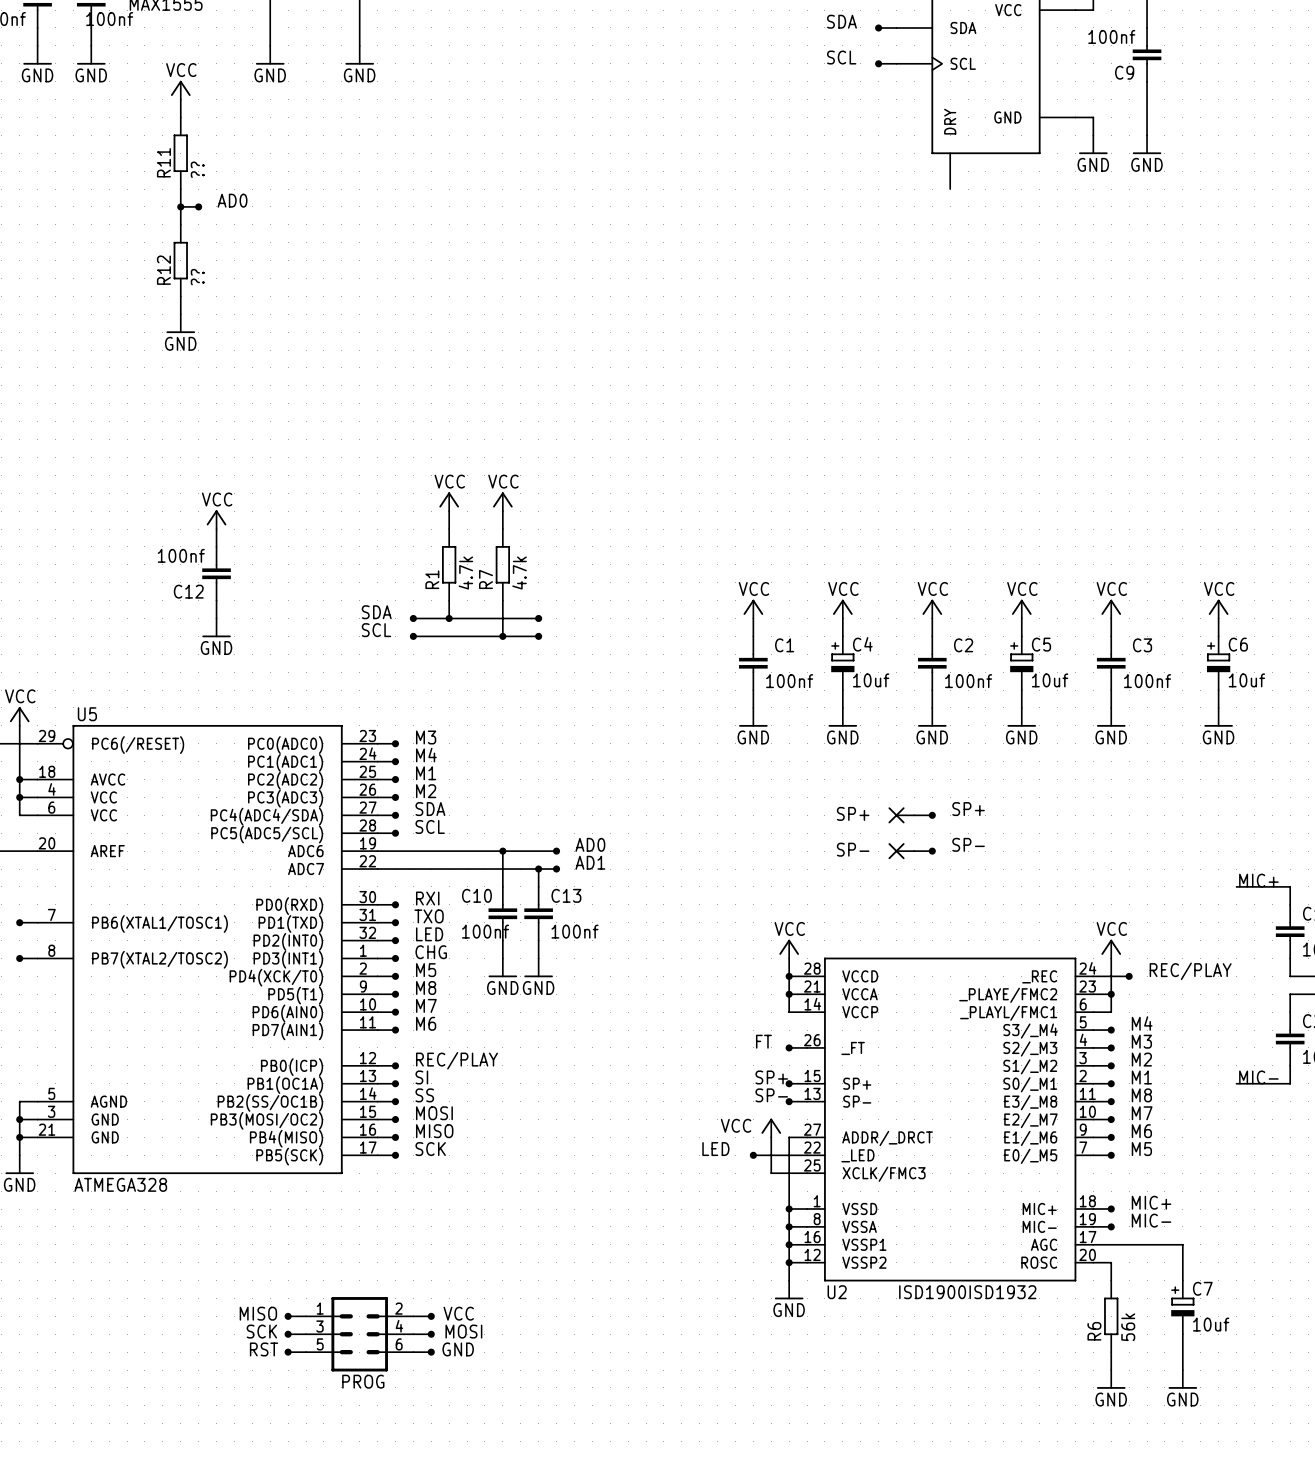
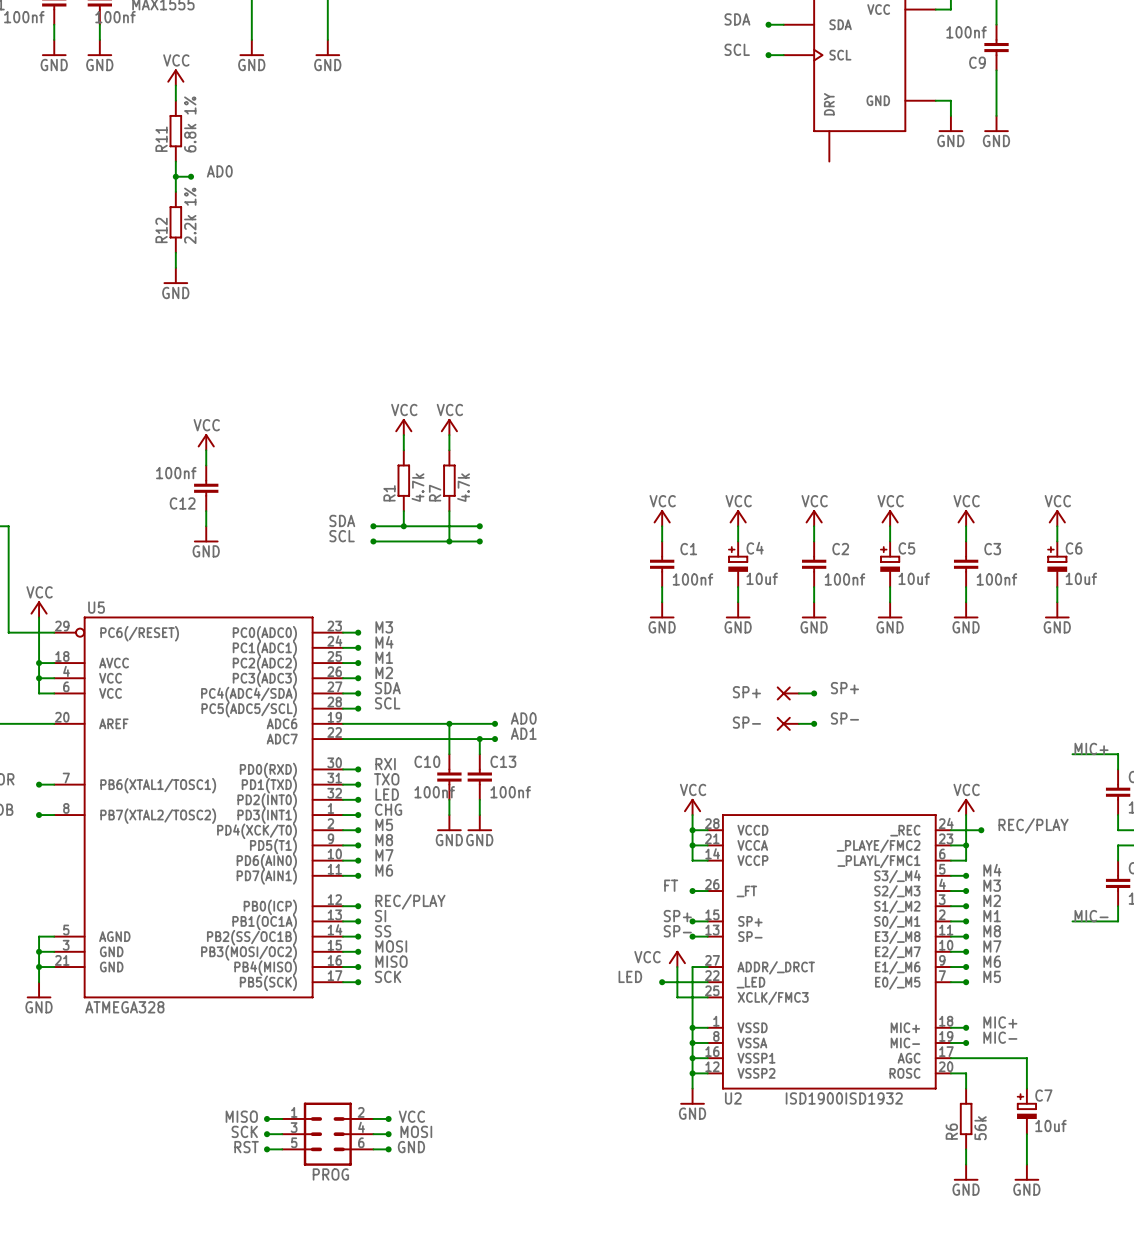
R11 value: ?? (197, 169) -> 6.8k 1% (190, 124)
R12 value: ?? (197, 277) -> 2.2k 1% (190, 215)

